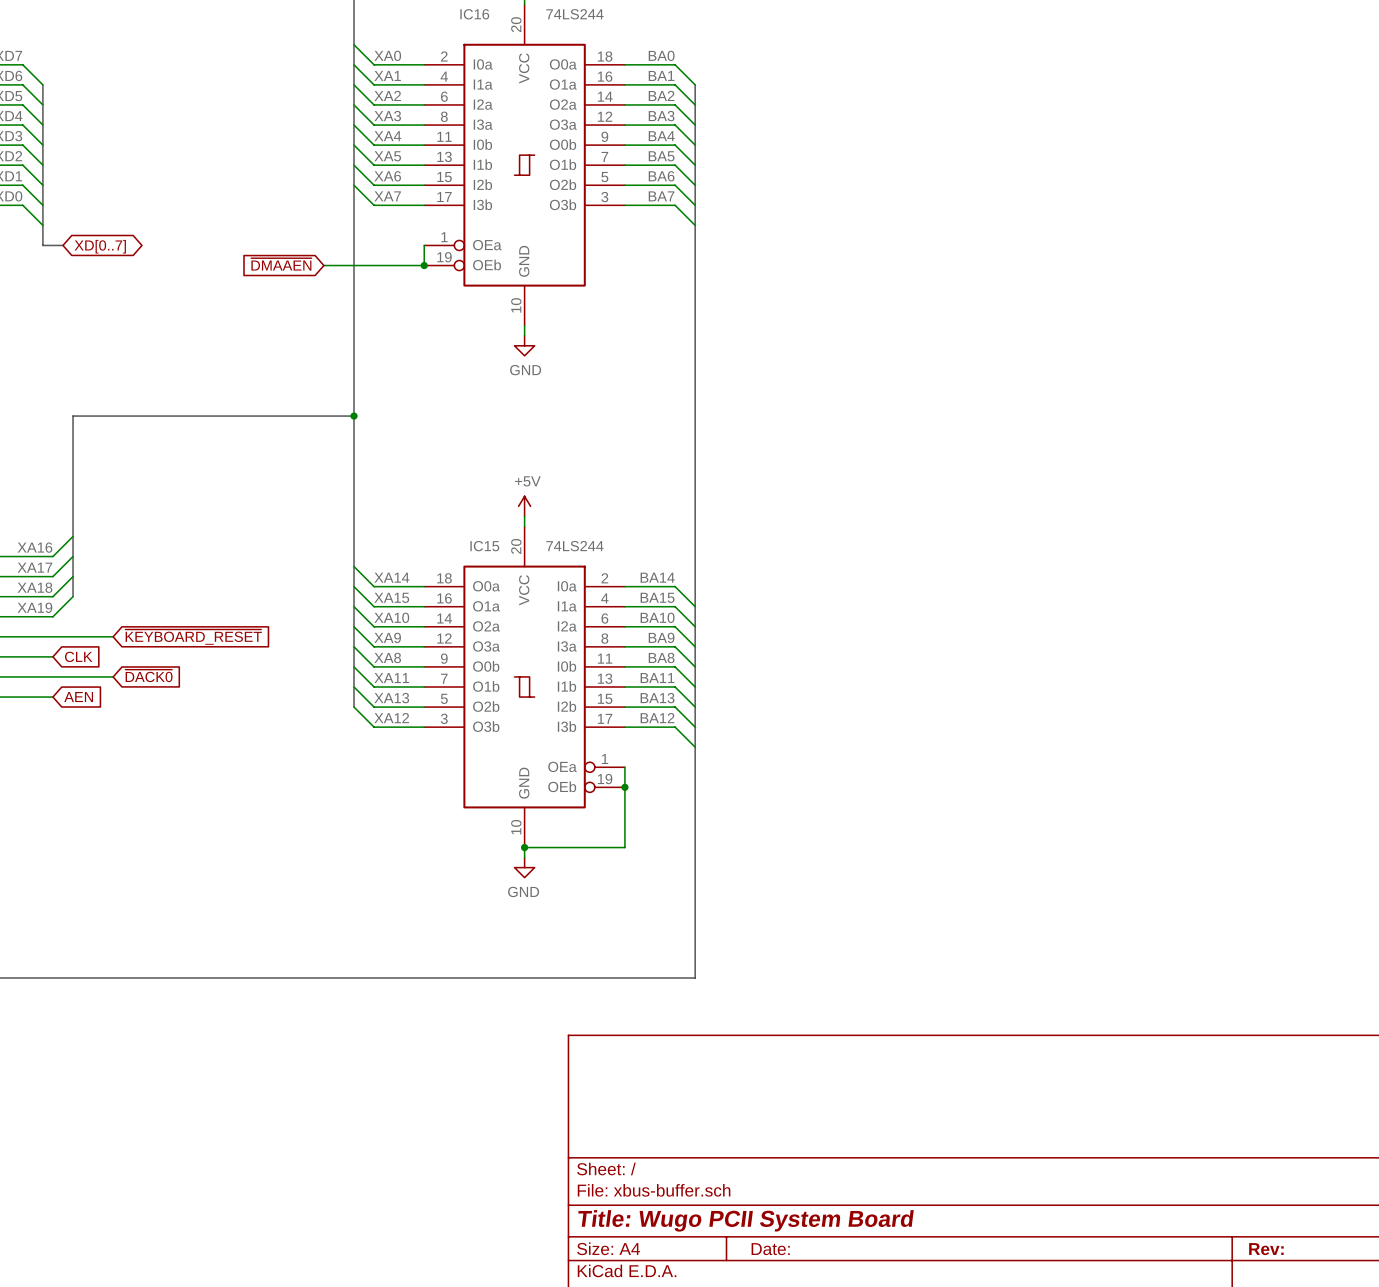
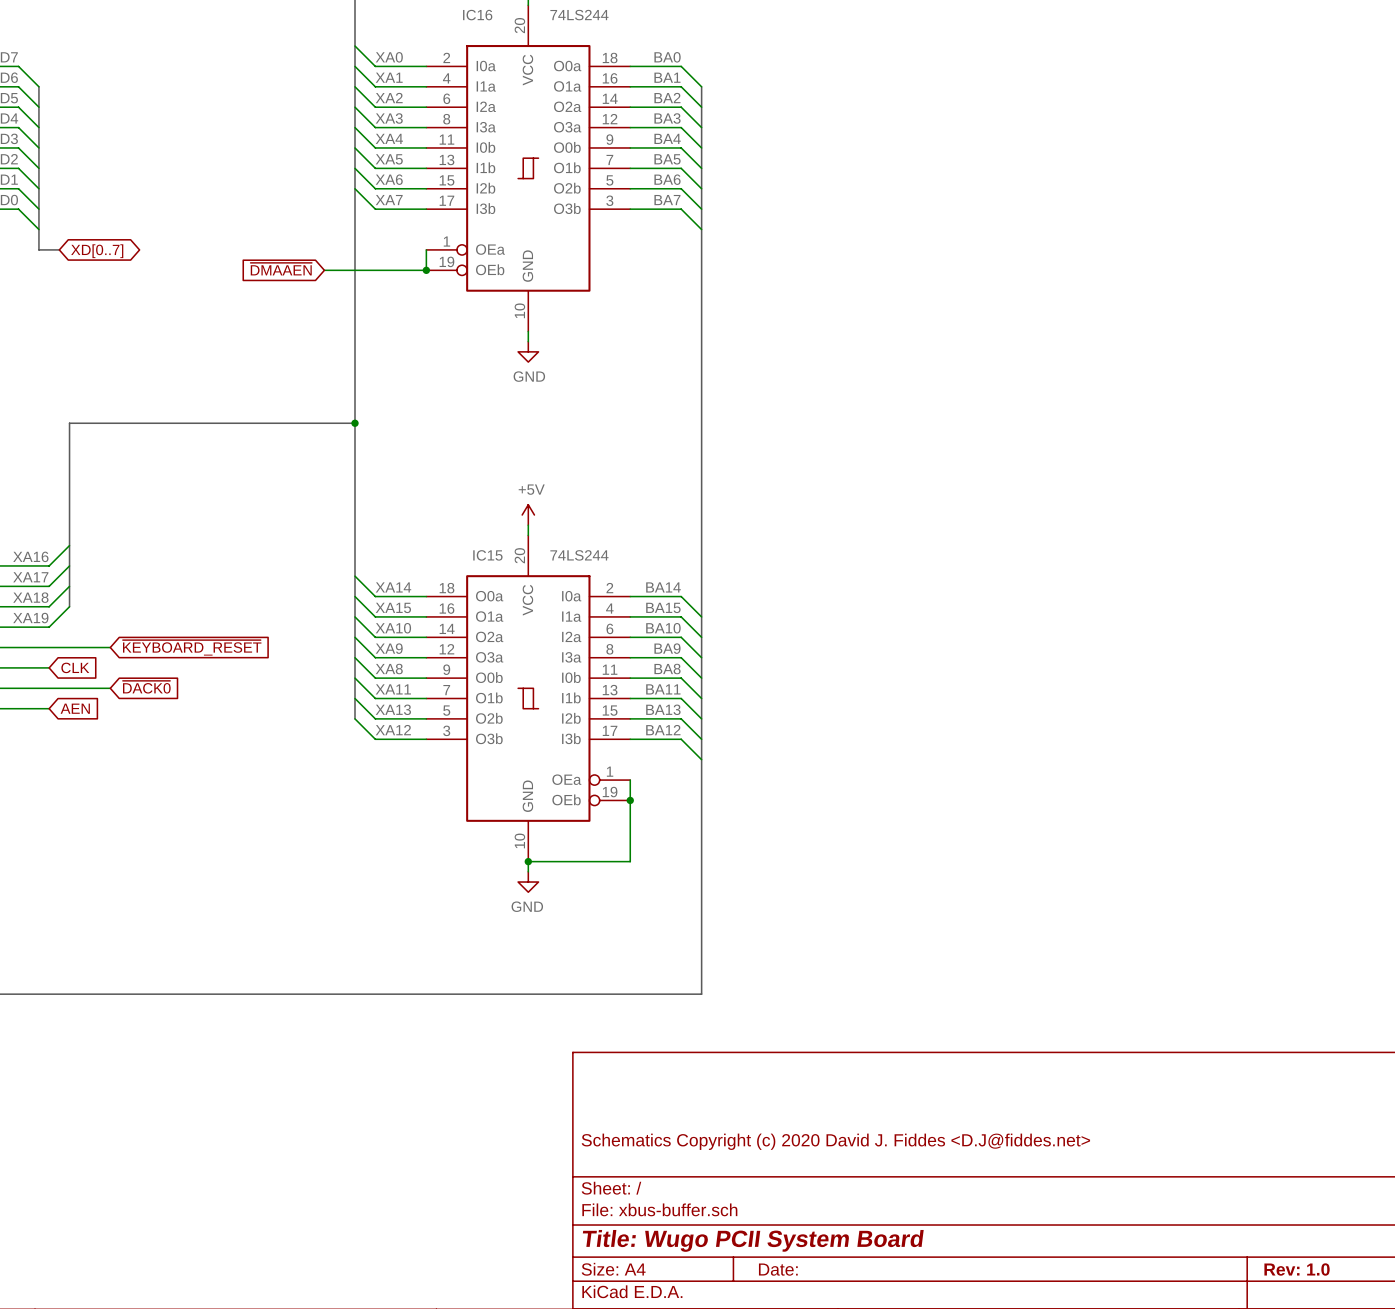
title block: none -> Schematics Copyright (c) 2020 David J. Fiddes <D.J@fiddes.net> (835, 1141)
title block: Rev: (1266, 1249) -> Rev: 1.0 (1297, 1269)

